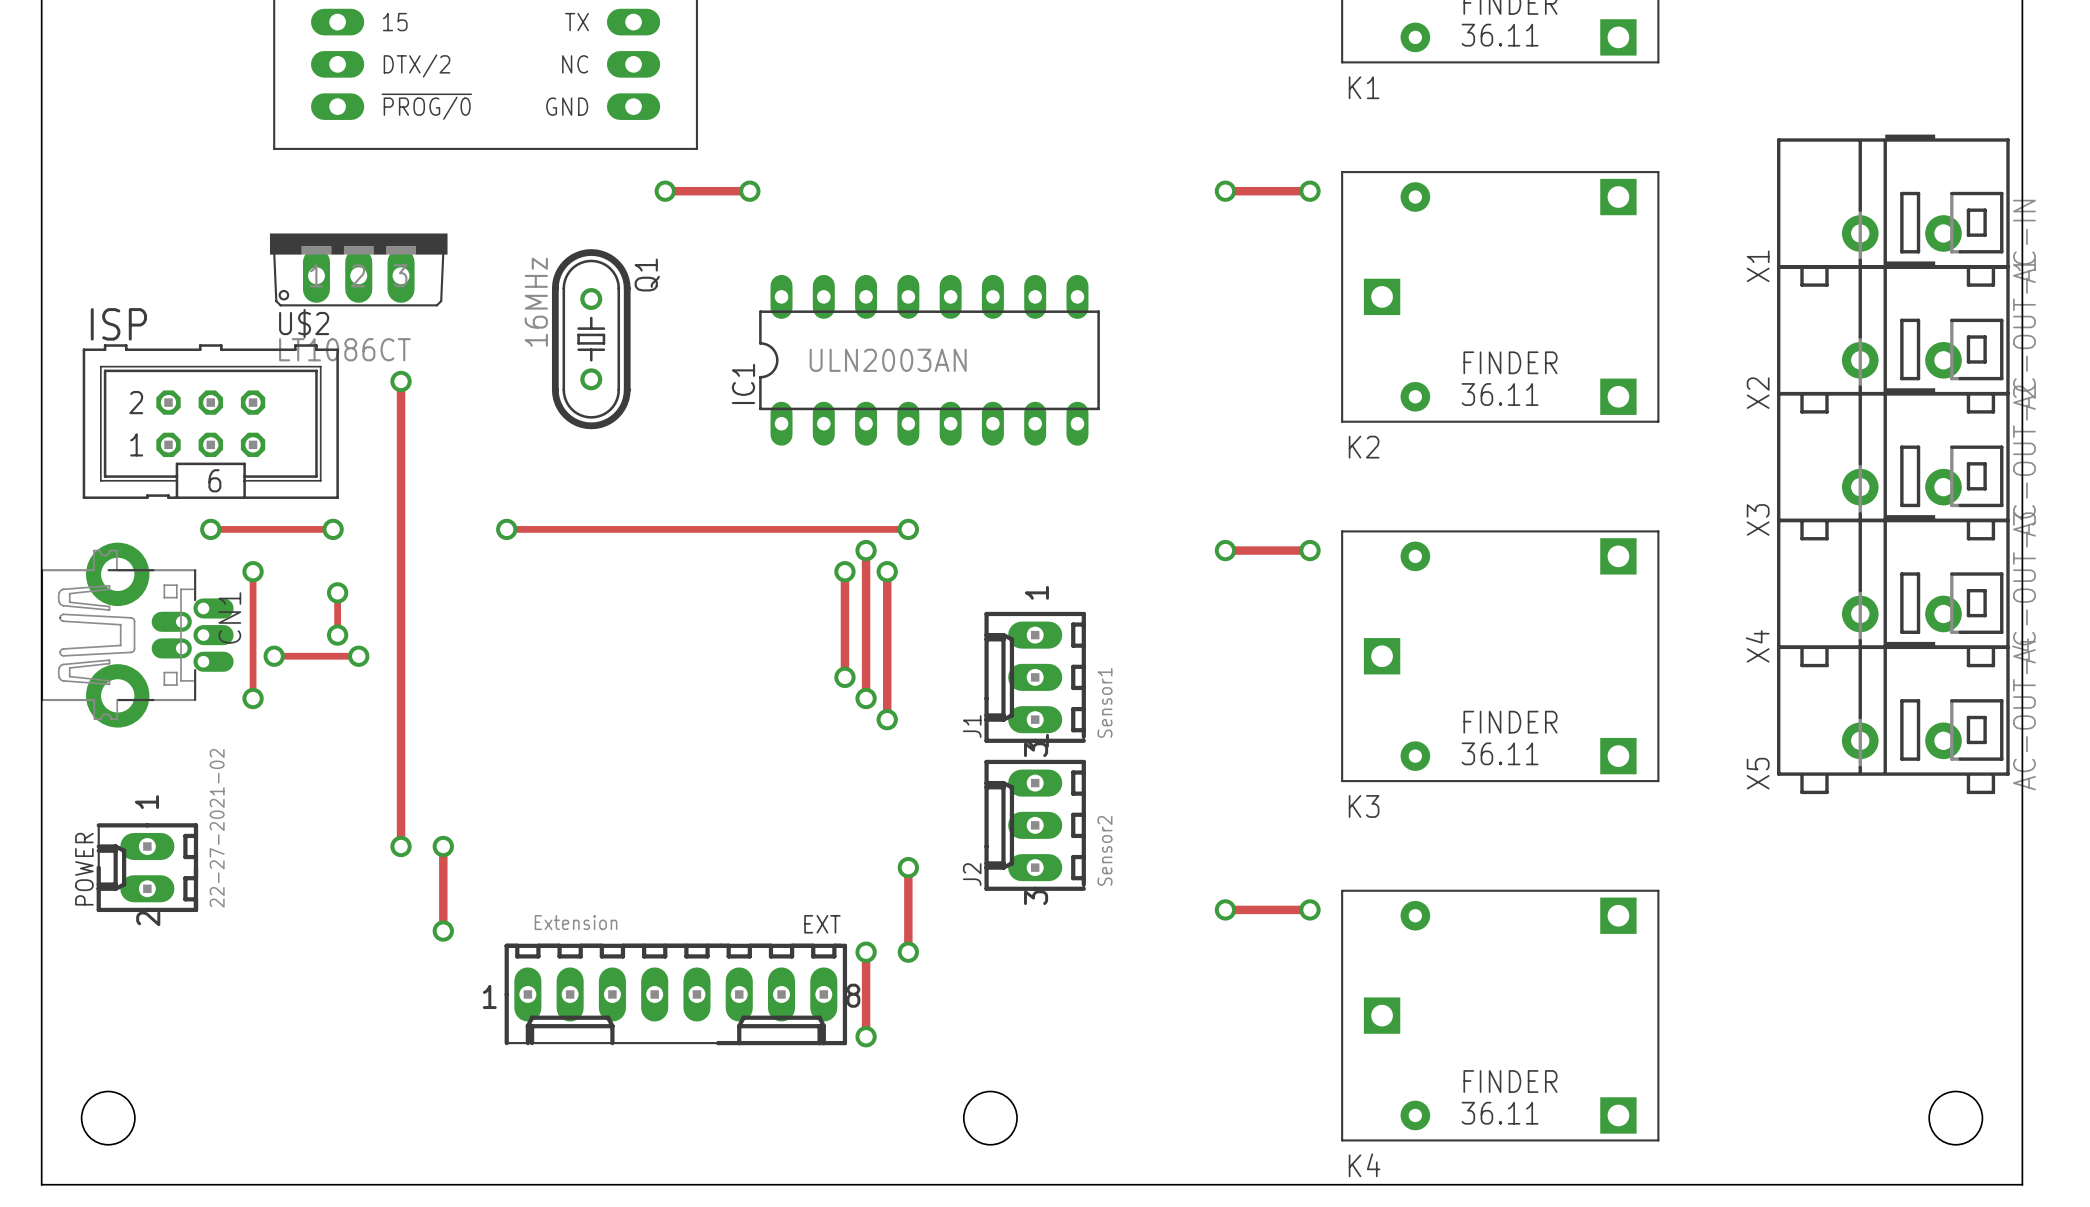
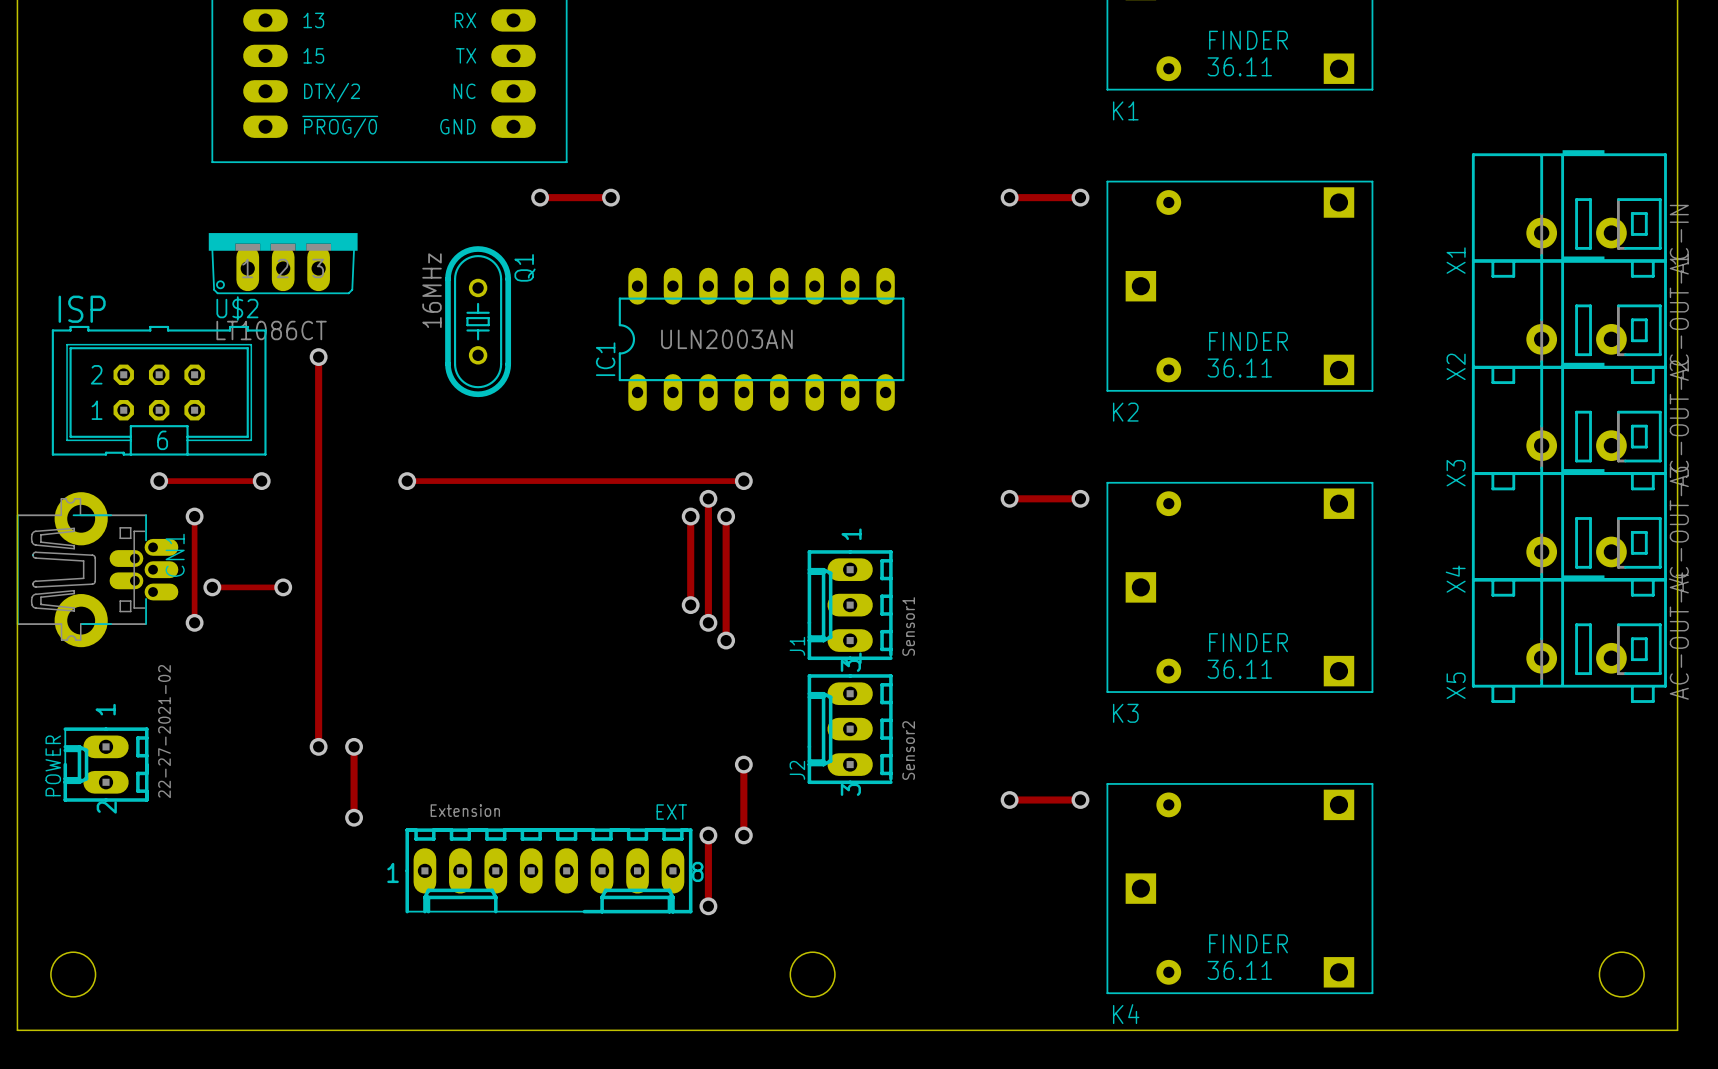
track: (337, 592) (337, 635) -> none
via: (337, 592) -> none
via: (337, 635) -> none

